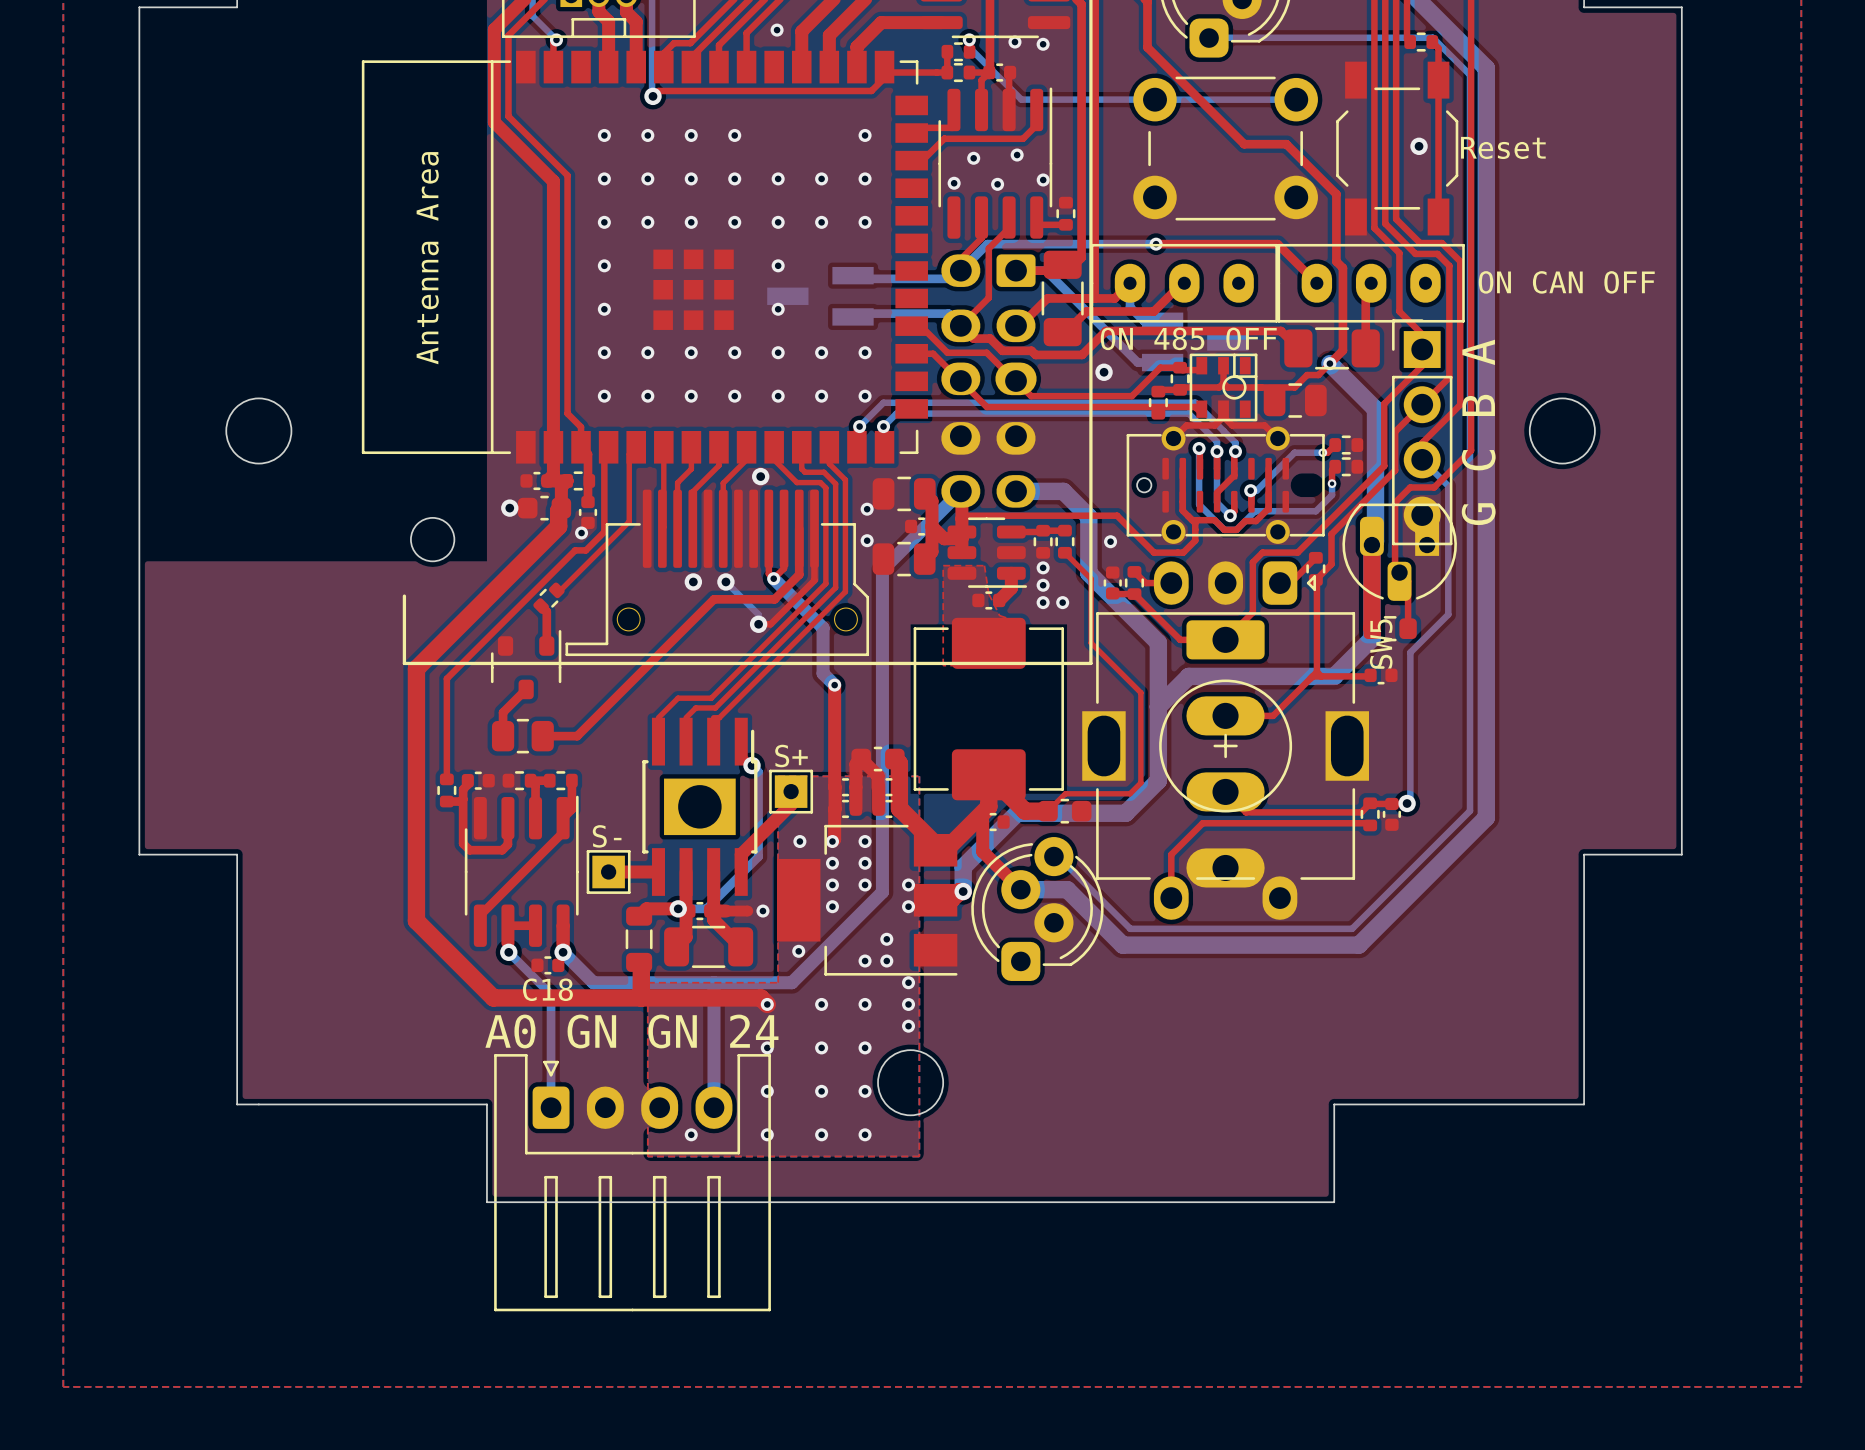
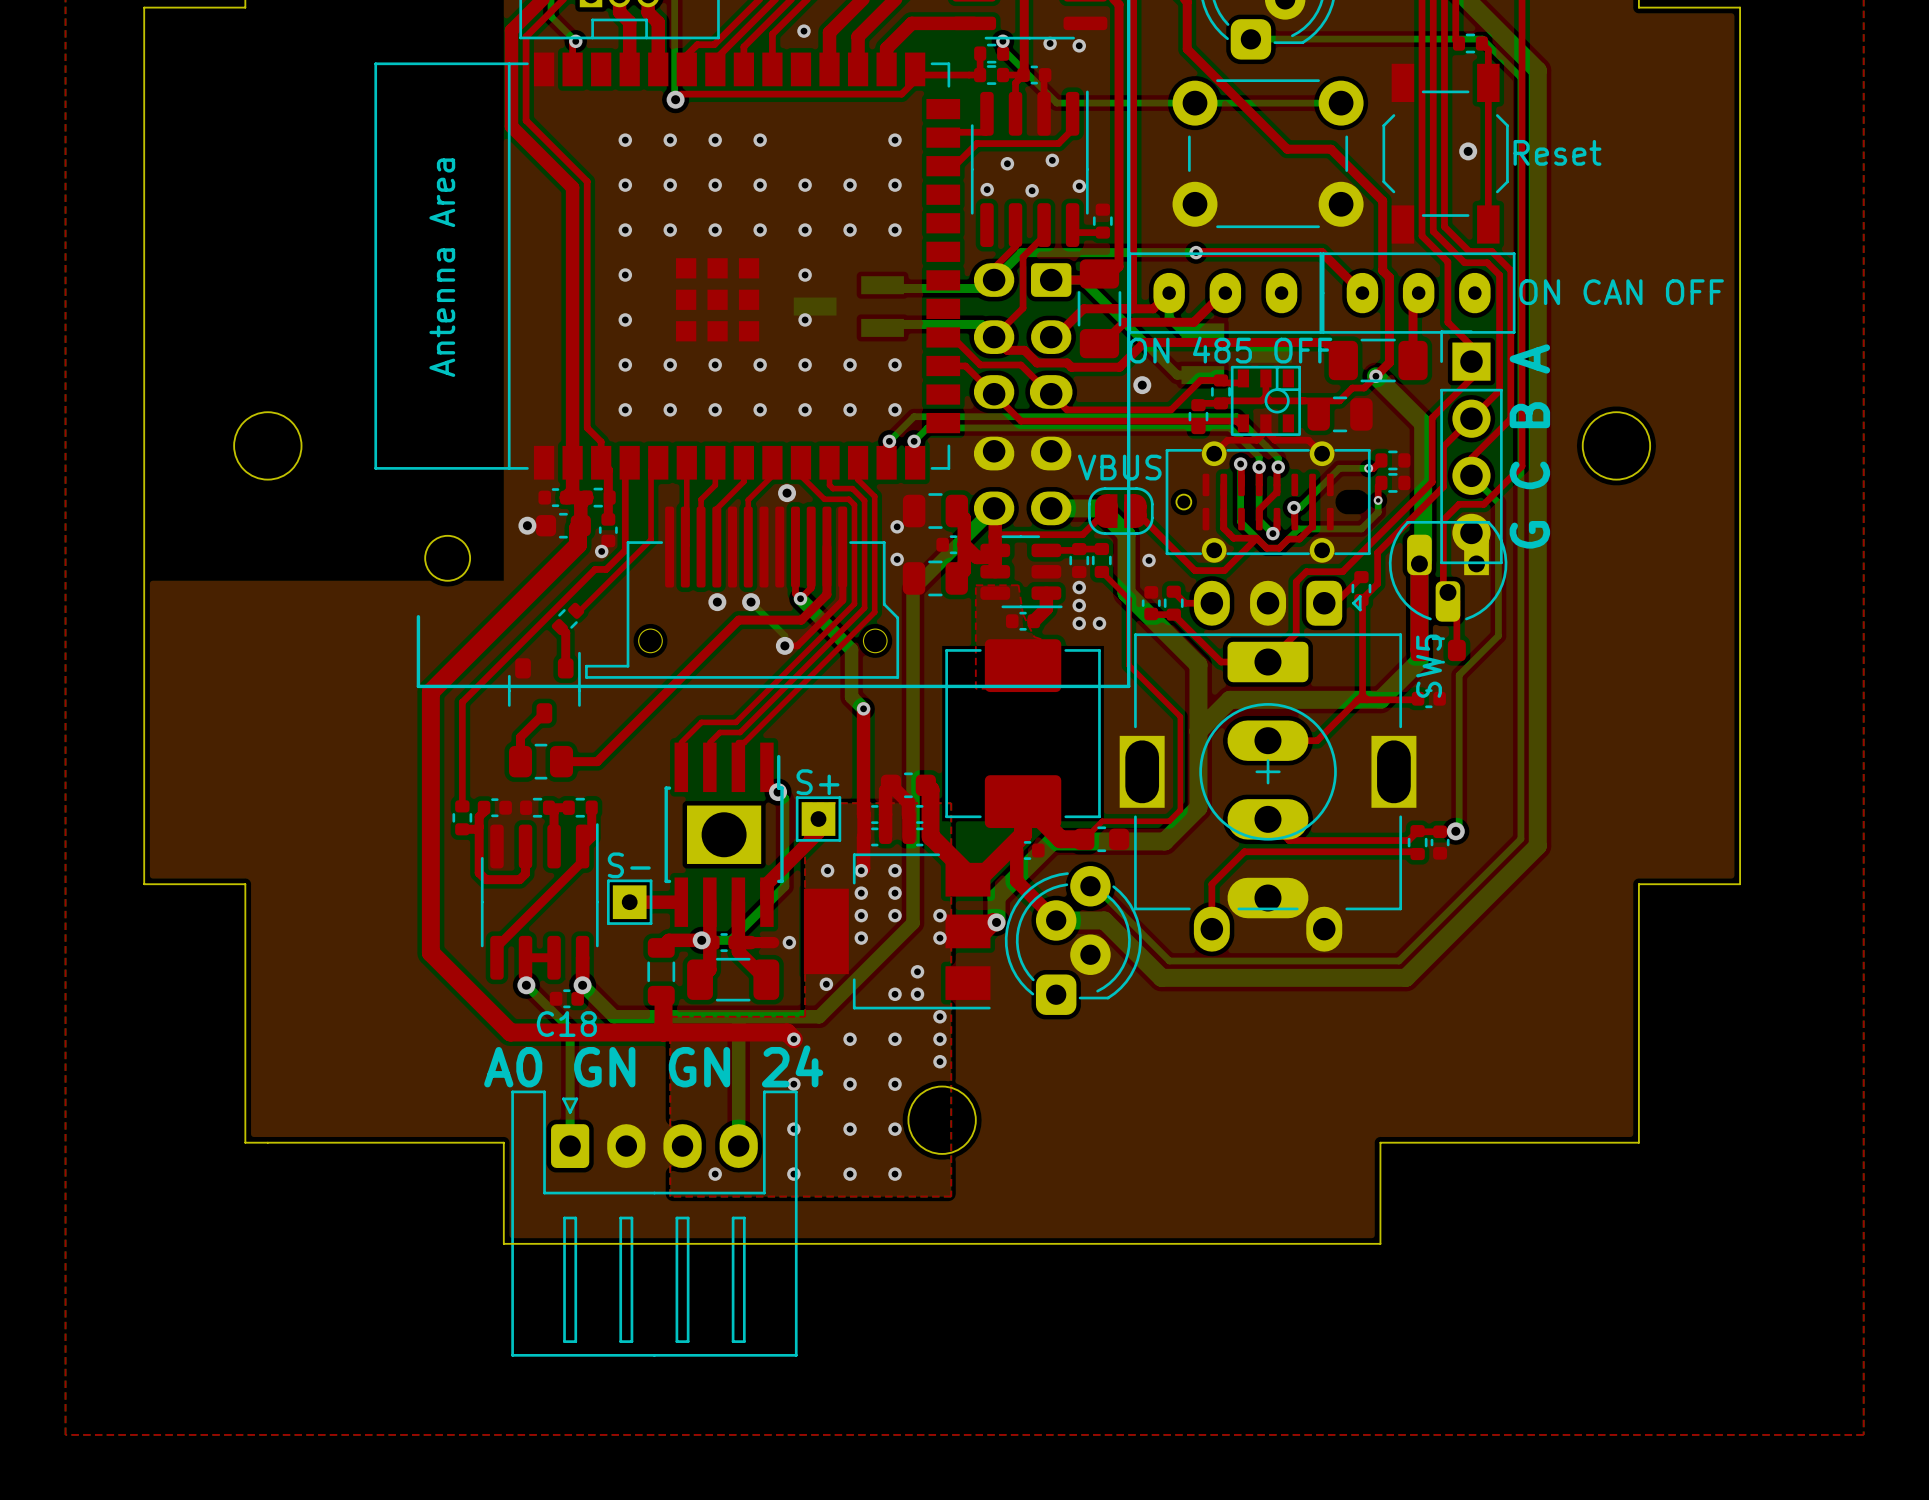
top track: none -> (1106, 511) (1082, 534) (997, 534)
part: none -> VBUS (1120, 511)
top track: none -> (1135, 511) (1194, 570) (1224, 570) (1256, 538)
top track: (964, 515) (1117, 515) (1154, 552) (1183, 552) (1195, 540) (1195, 523) (1192, 520) -> none

